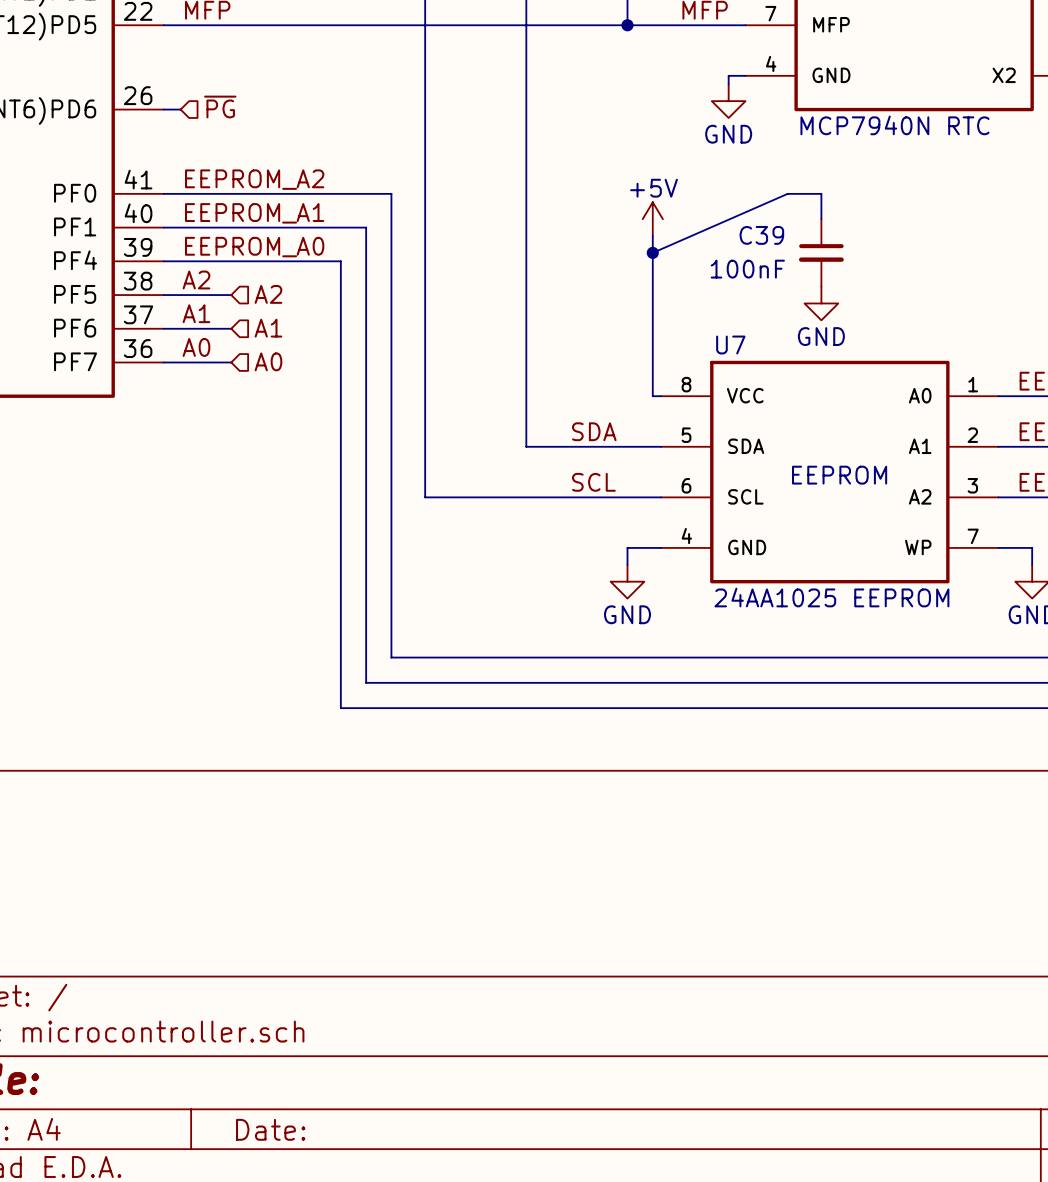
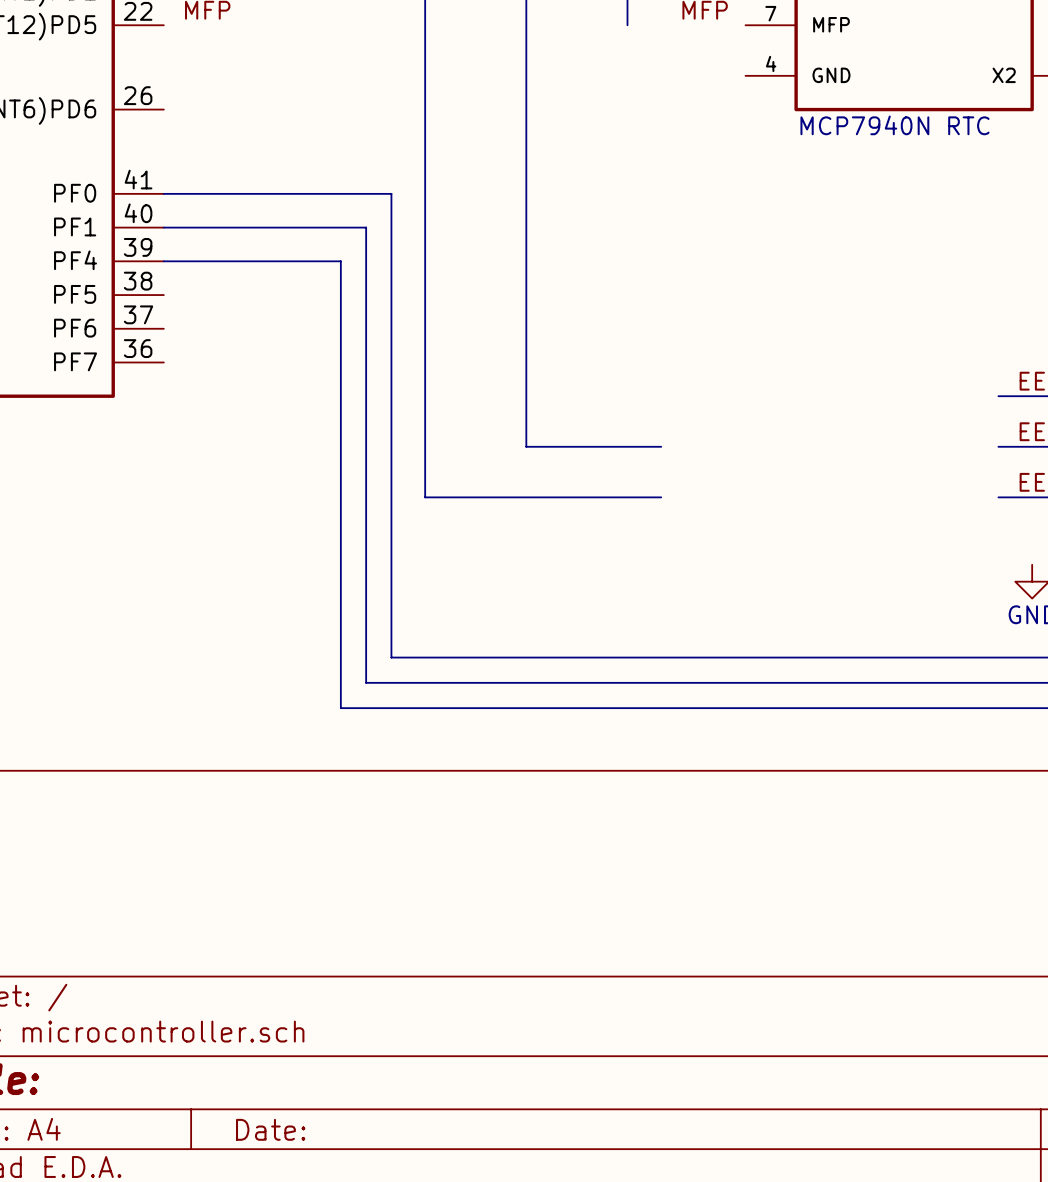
wire: (163, 25) (745, 25) -> none
junction: (627, 25) -> none
wire: (745, 75) (728, 75) (728, 84) -> none
power symbol: GND (728, 101) -> none
hierarchical label: ~{PG} (220, 107) -> none
wire: (163, 109) (180, 109) -> none
label: EEPROM_A2 (254, 179) -> none
label: EEPROM_A1 (254, 213) -> none
power symbol: +5V (652, 219) -> none
wire: (821, 219) (821, 193) (787, 193) (652, 252) -> none
wire: (652, 236) (652, 396) (661, 396) -> none
label: EEPROM_A0 (254, 247) -> none
junction: (652, 252) -> none
C39: 100nF (821, 252) -> none
label: A2 (196, 279) -> none
hierarchical label: A2 (268, 294) -> none
wire: (163, 295) (231, 295) -> none
power symbol: GND (821, 303) -> none
label: A1 (196, 313) -> none
wire: (163, 328) (231, 328) -> none
hierarchical label: A1 (268, 328) -> none
label: A0 (196, 347) -> none
hierarchical label: A0 (268, 361) -> none
wire: (163, 362) (231, 362) -> none
label: SDA (594, 431) -> none
U7: 24AA1025 EEPROM (829, 472) -> none
text: EEPROM (839, 475) -> none
label: SCL (593, 482) -> none
wire: (661, 547) (627, 547) (627, 564) -> none
wire: (998, 547) (1032, 547) (1032, 564) -> none
power symbol: GND (627, 581) -> none

